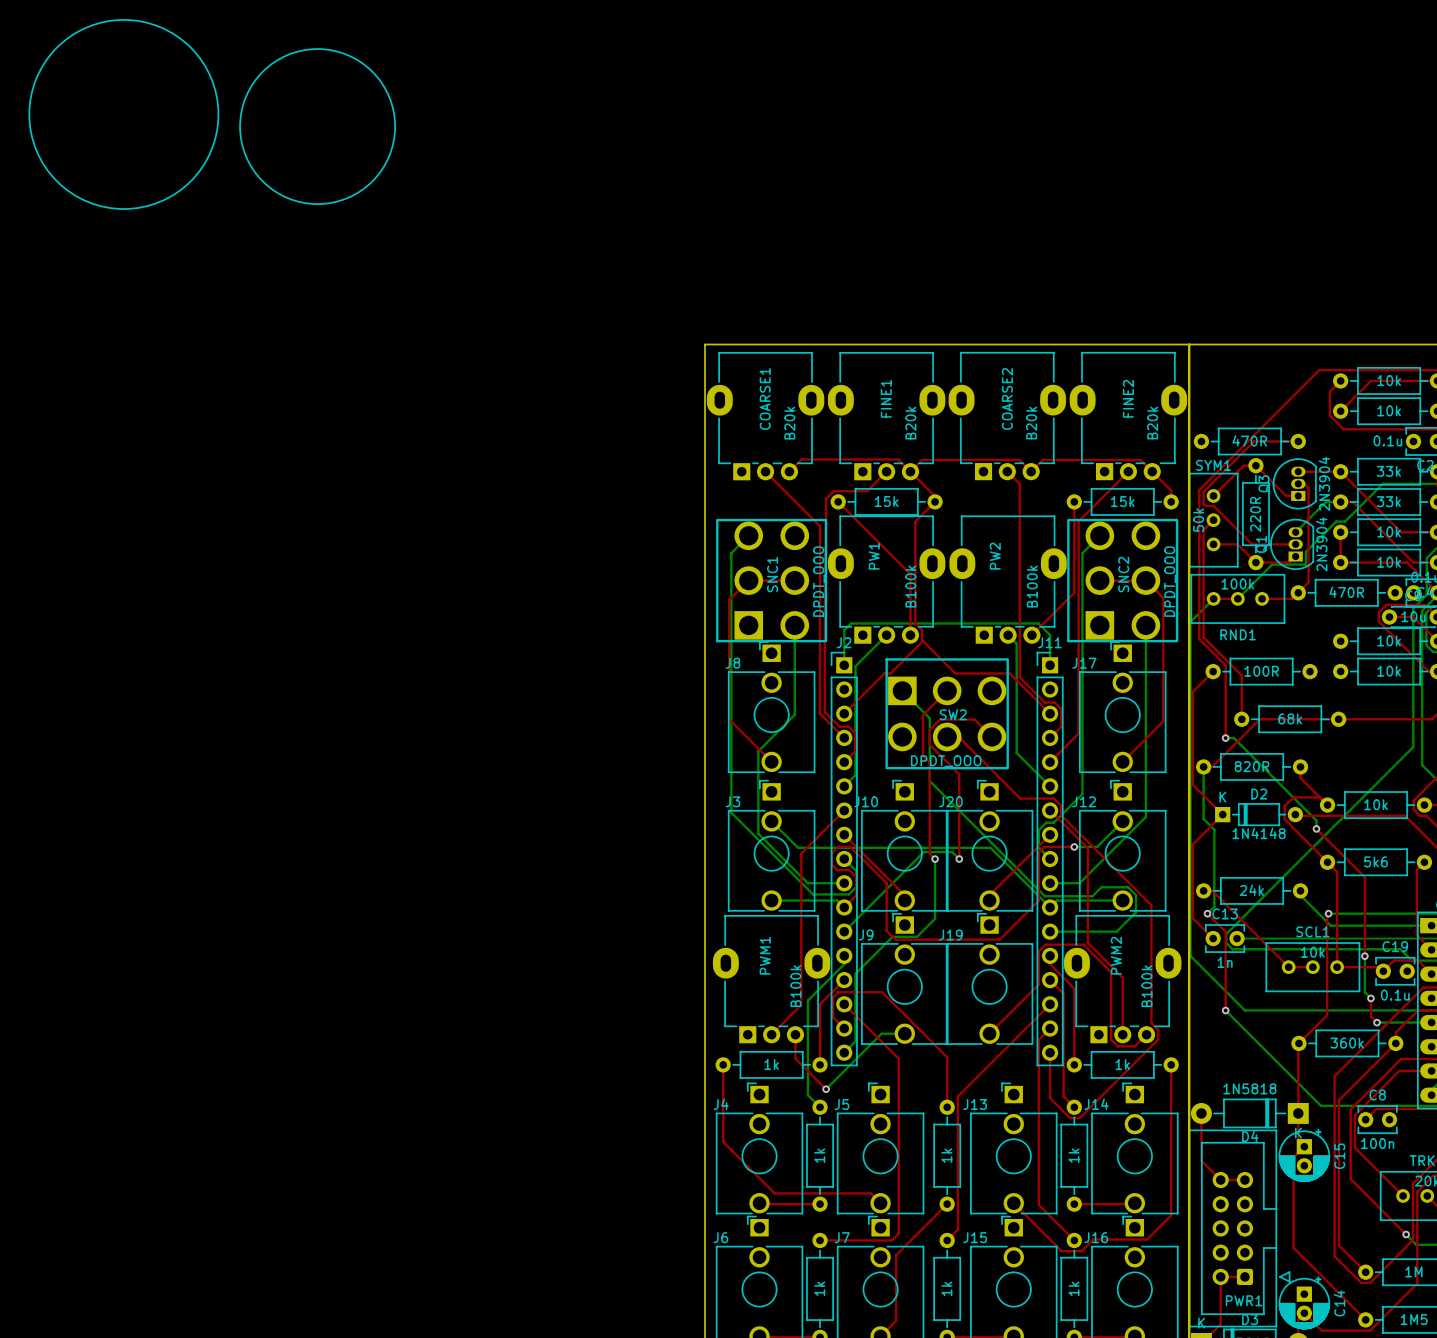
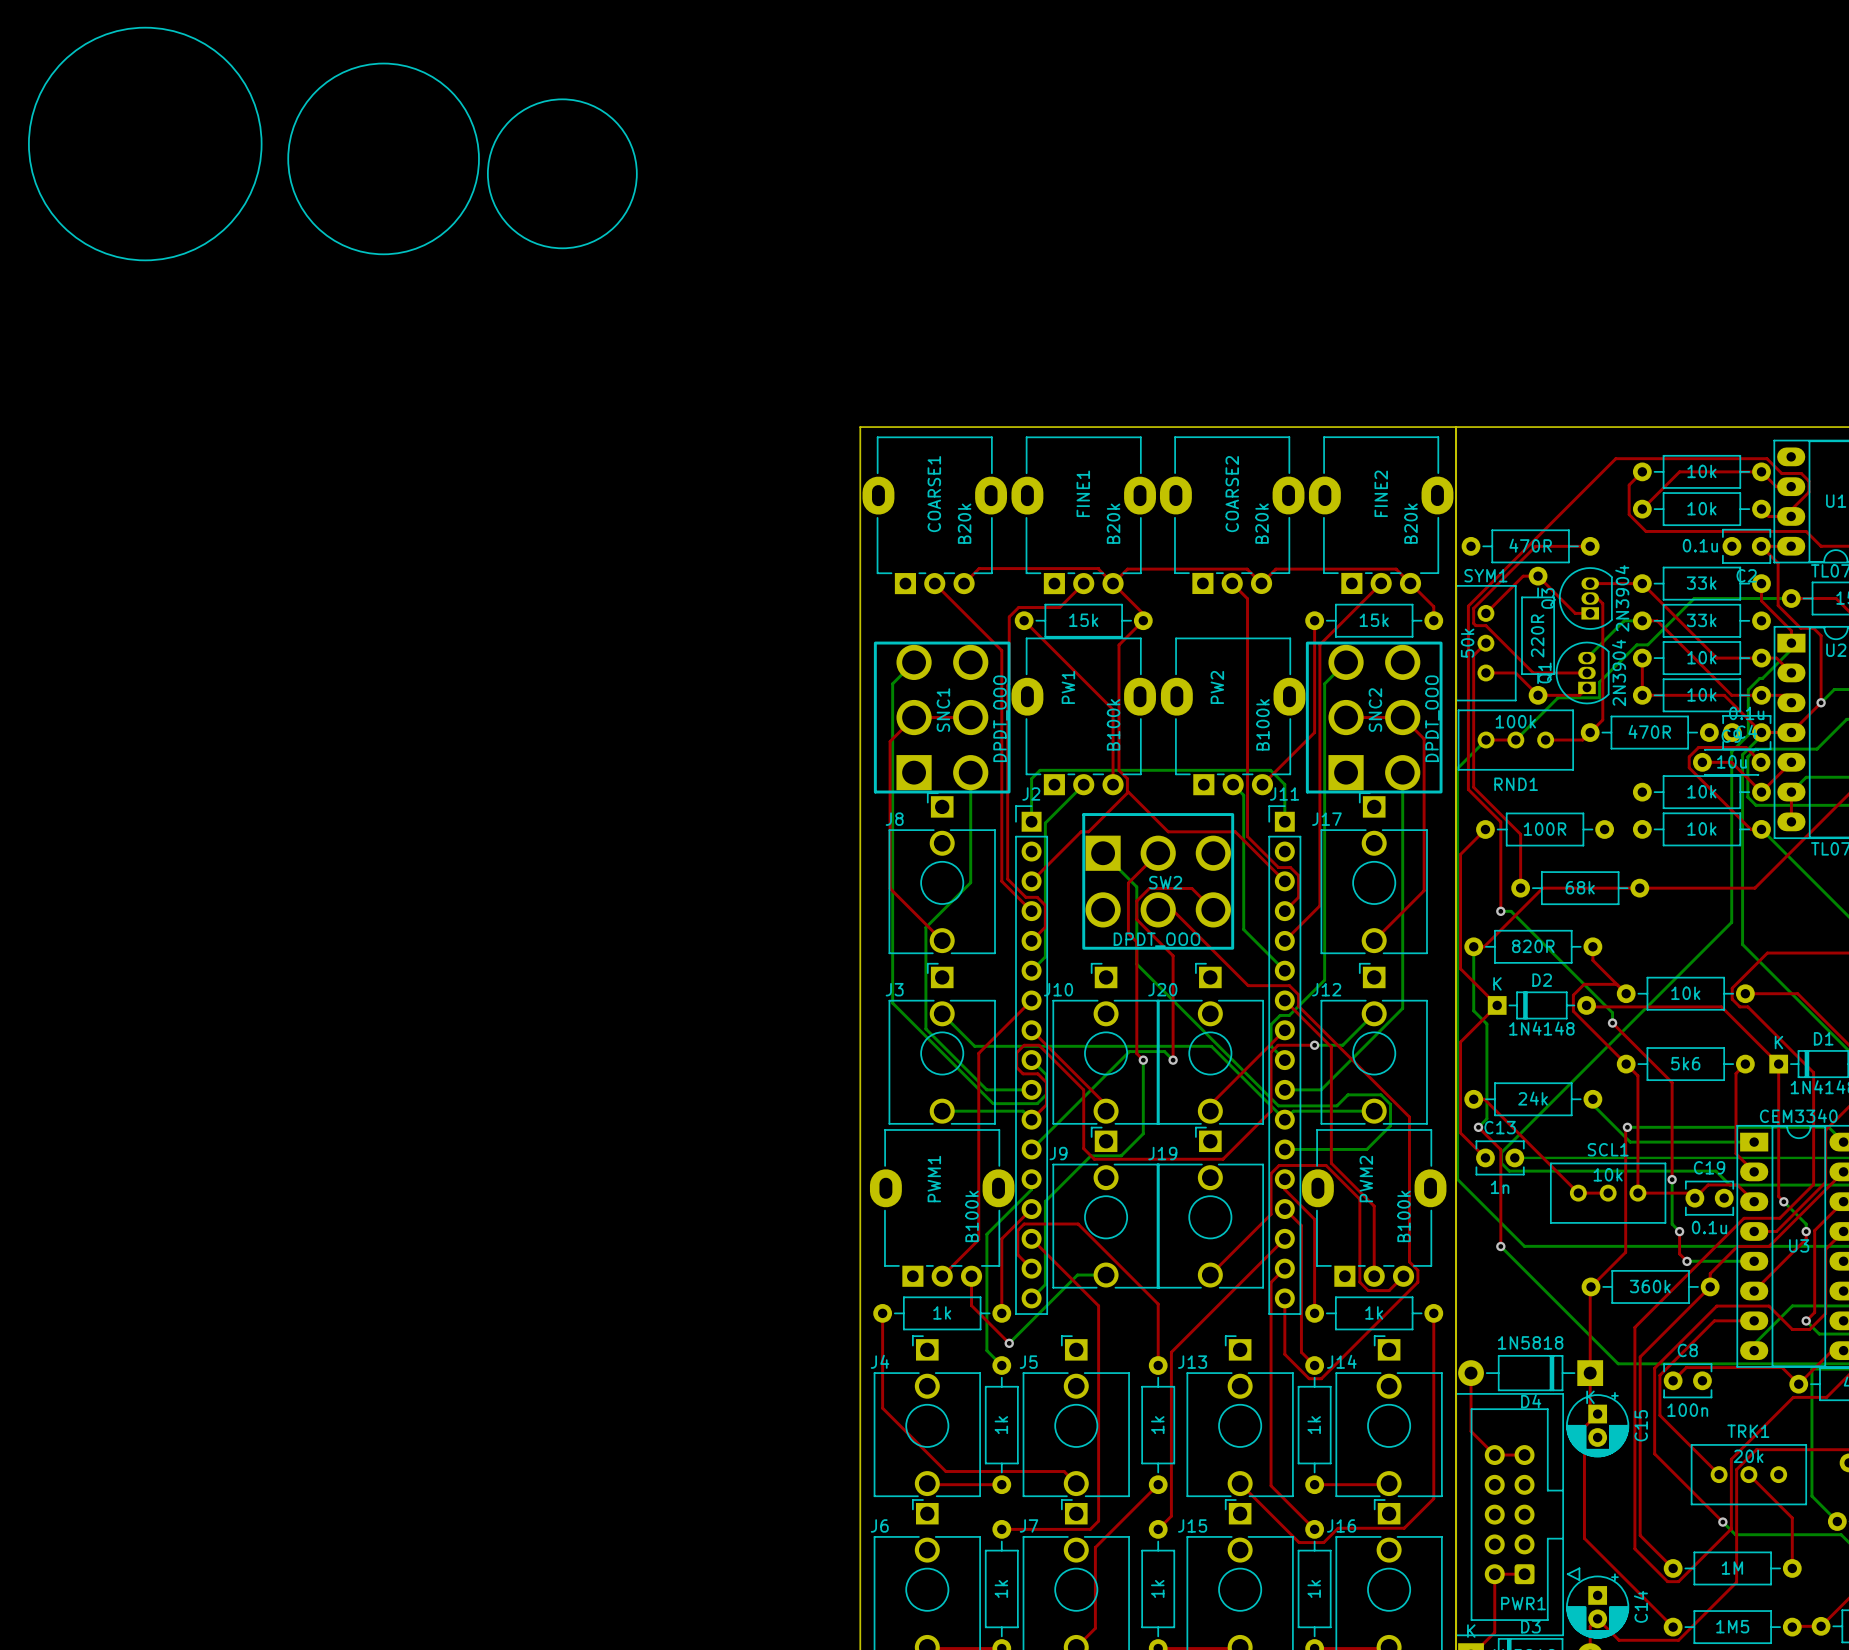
drawing: none -> [487, 98, 638, 250]

